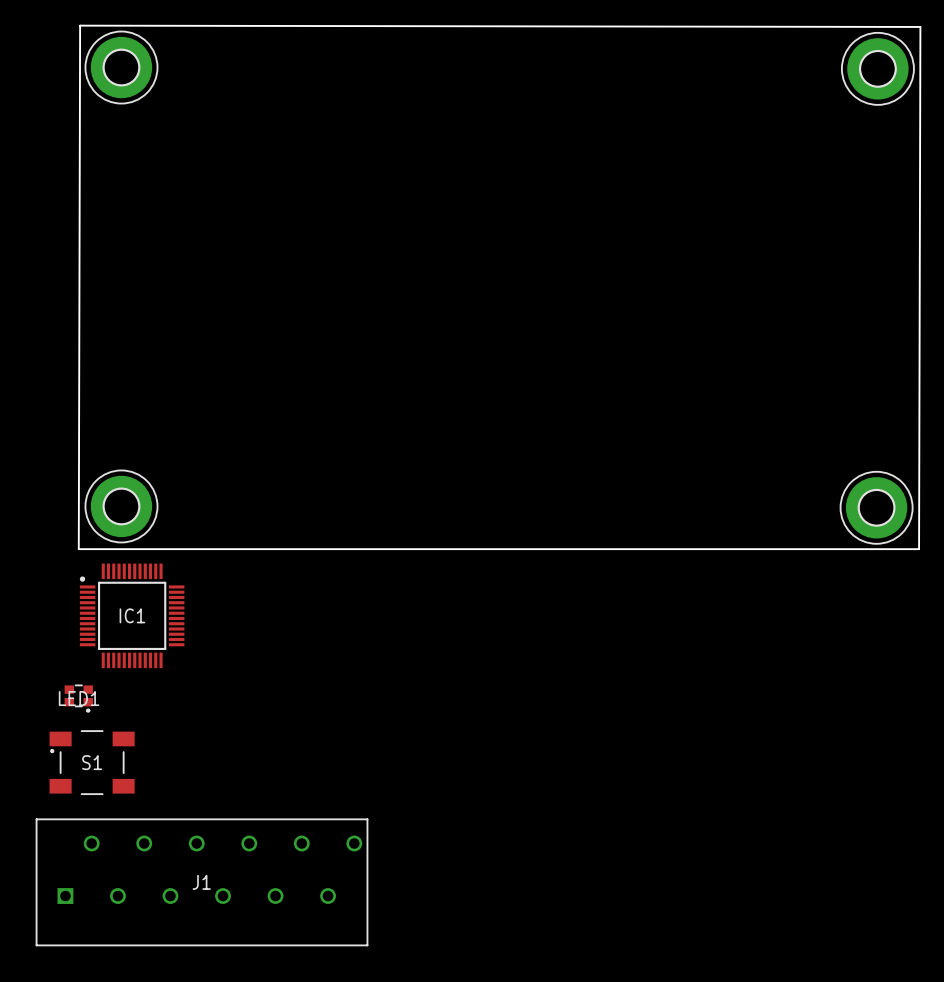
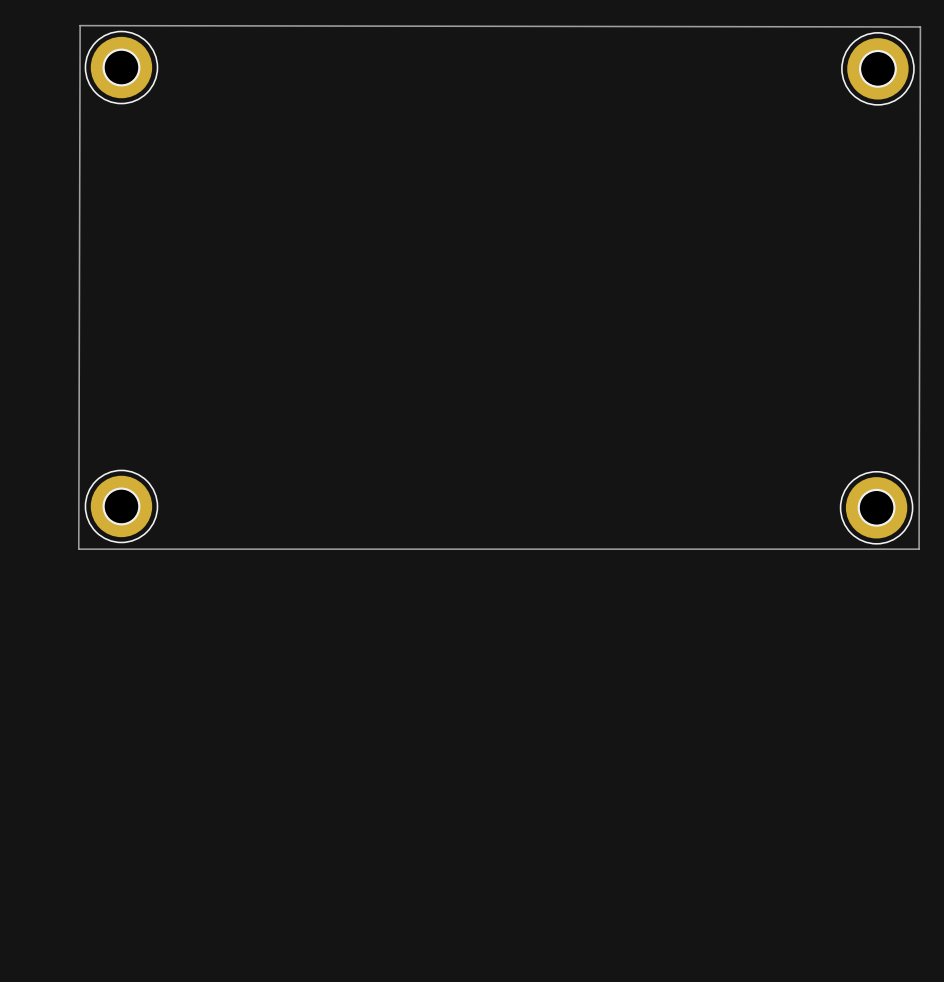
IC1: (132, 615) -> none
LED1: (78, 698) -> none
S1: (92, 762) -> none
J1: (202, 882) -> none

